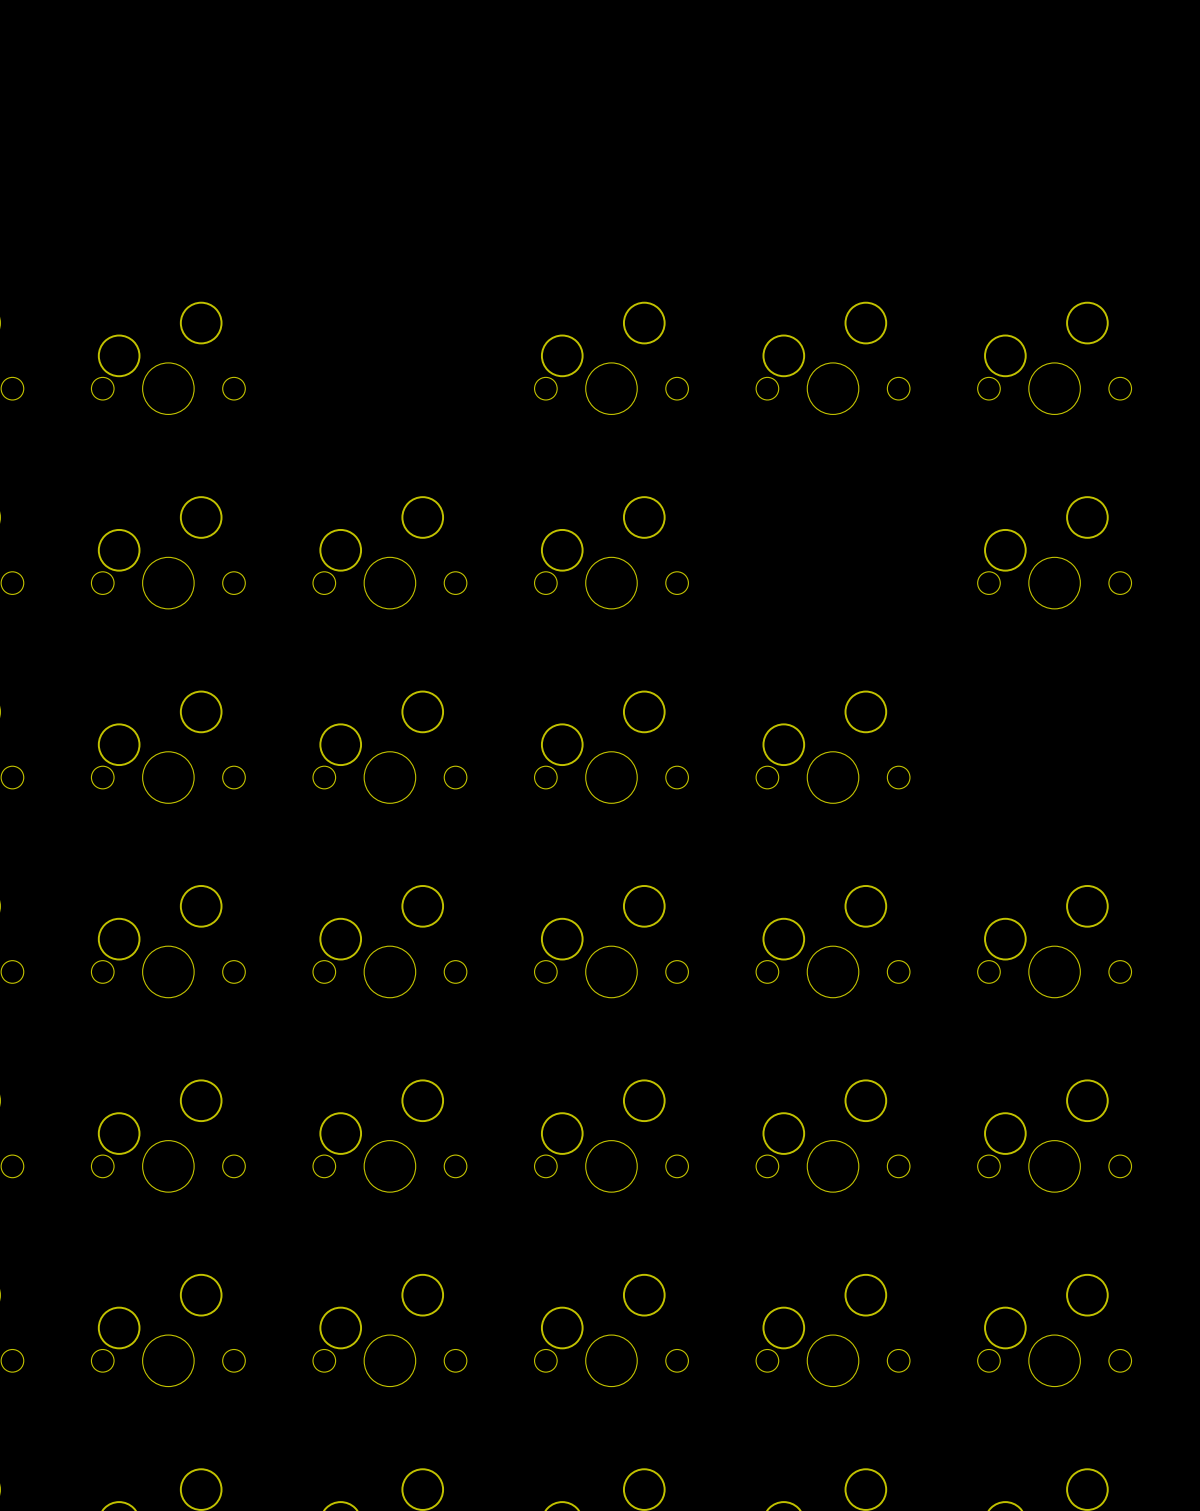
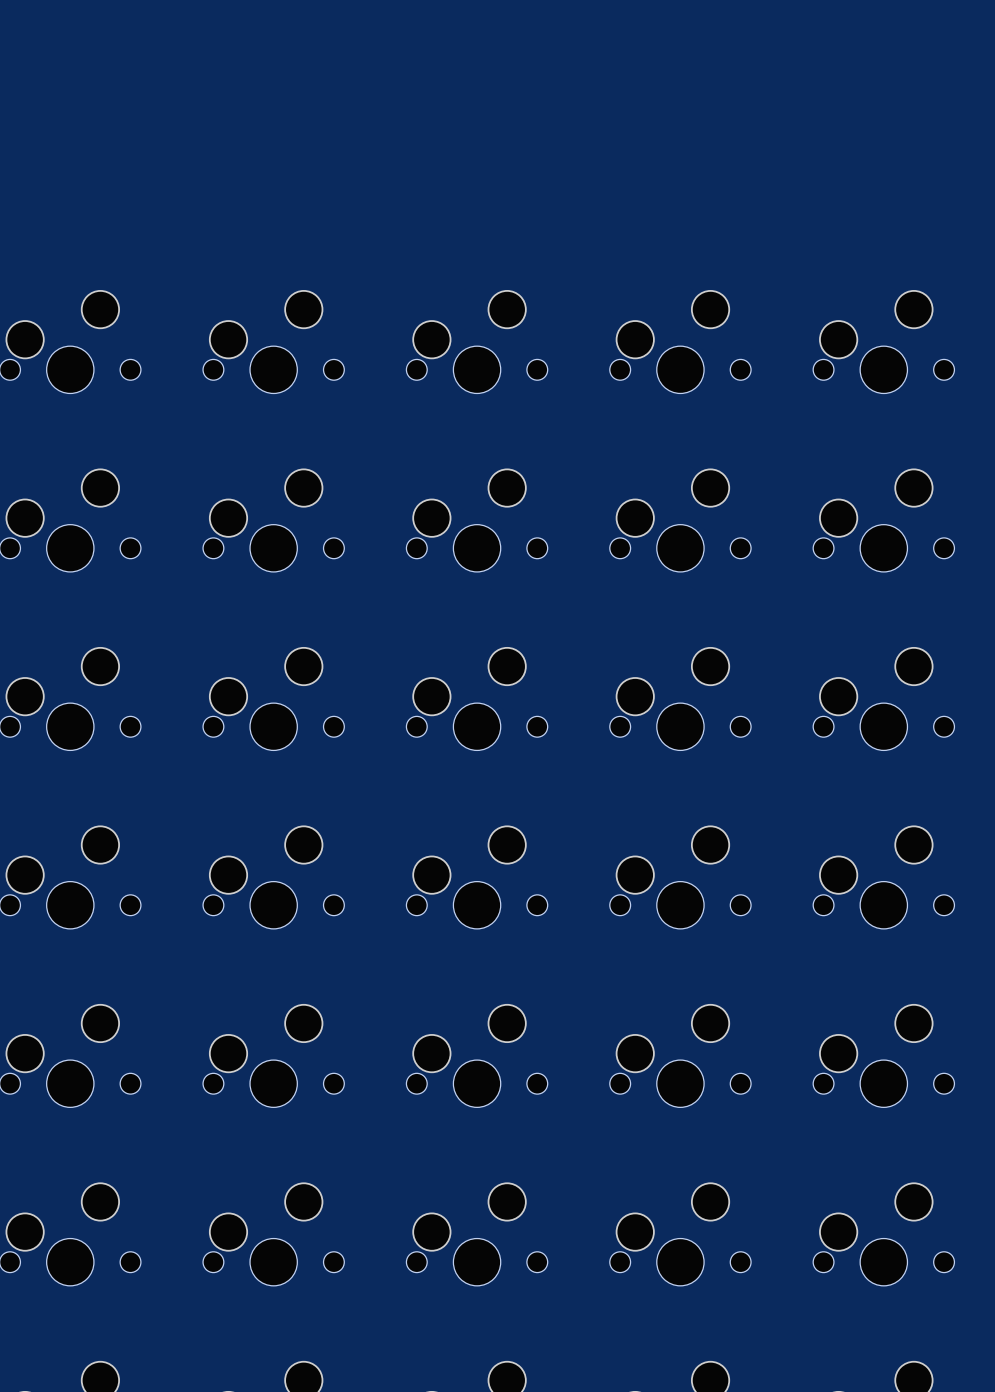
part: none -> (273, 341)
part: none -> (680, 520)
part: none -> (883, 698)

